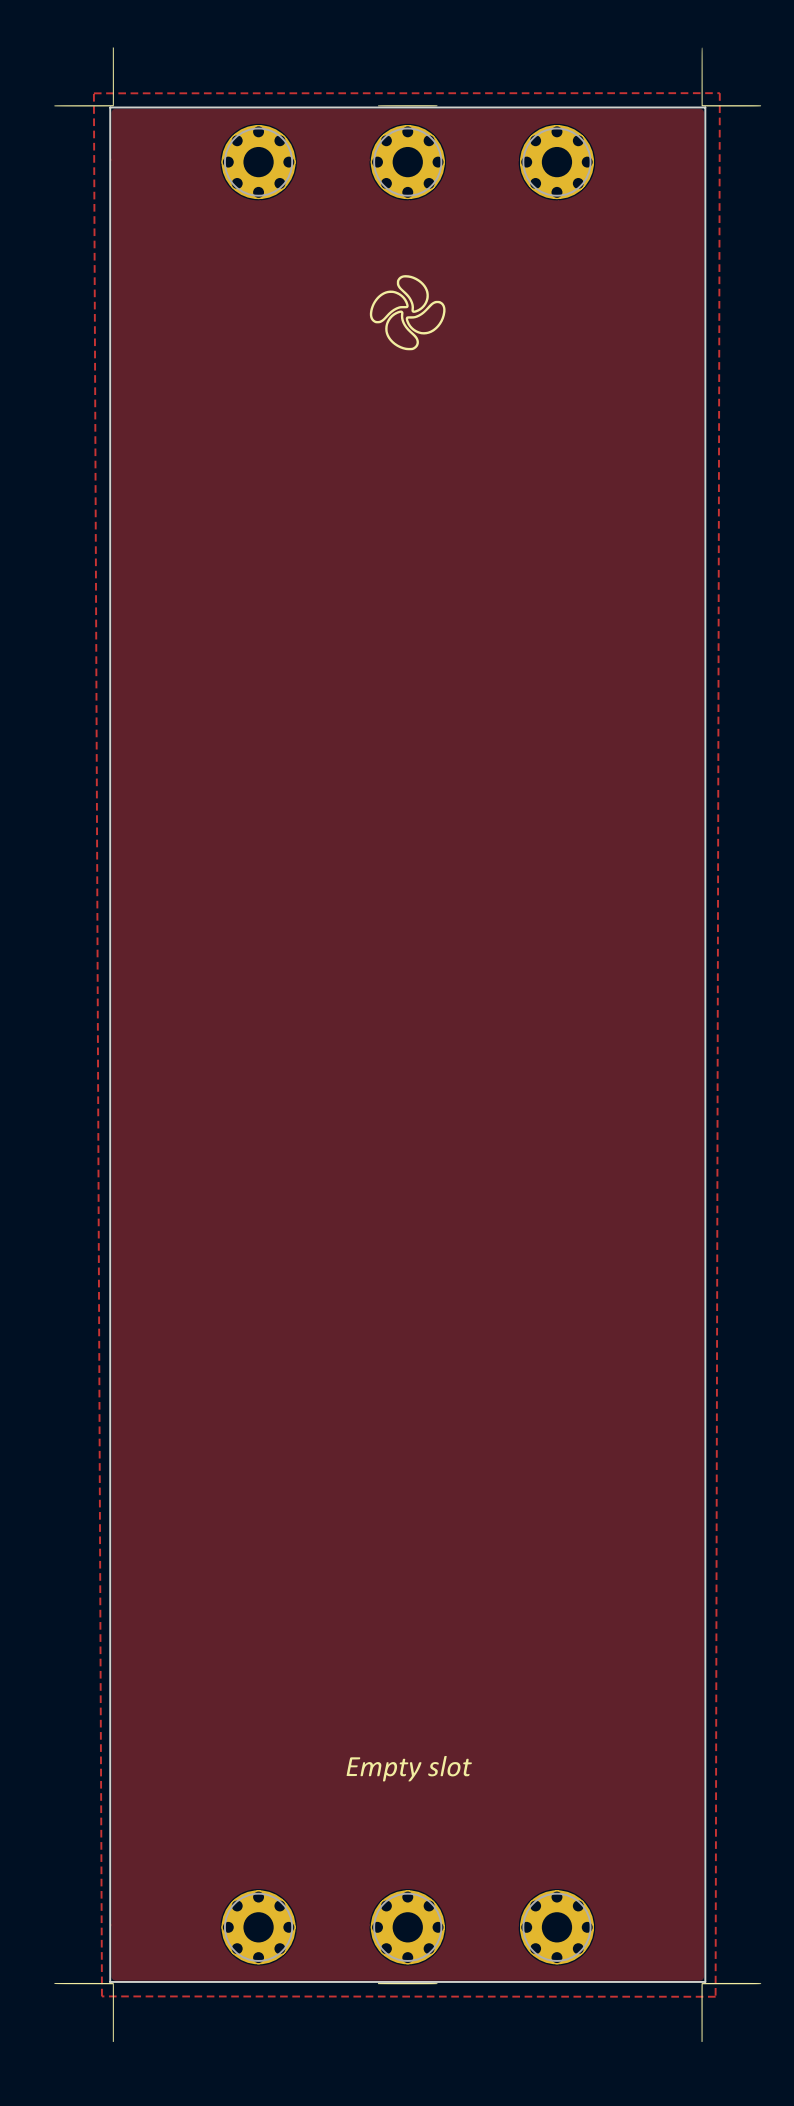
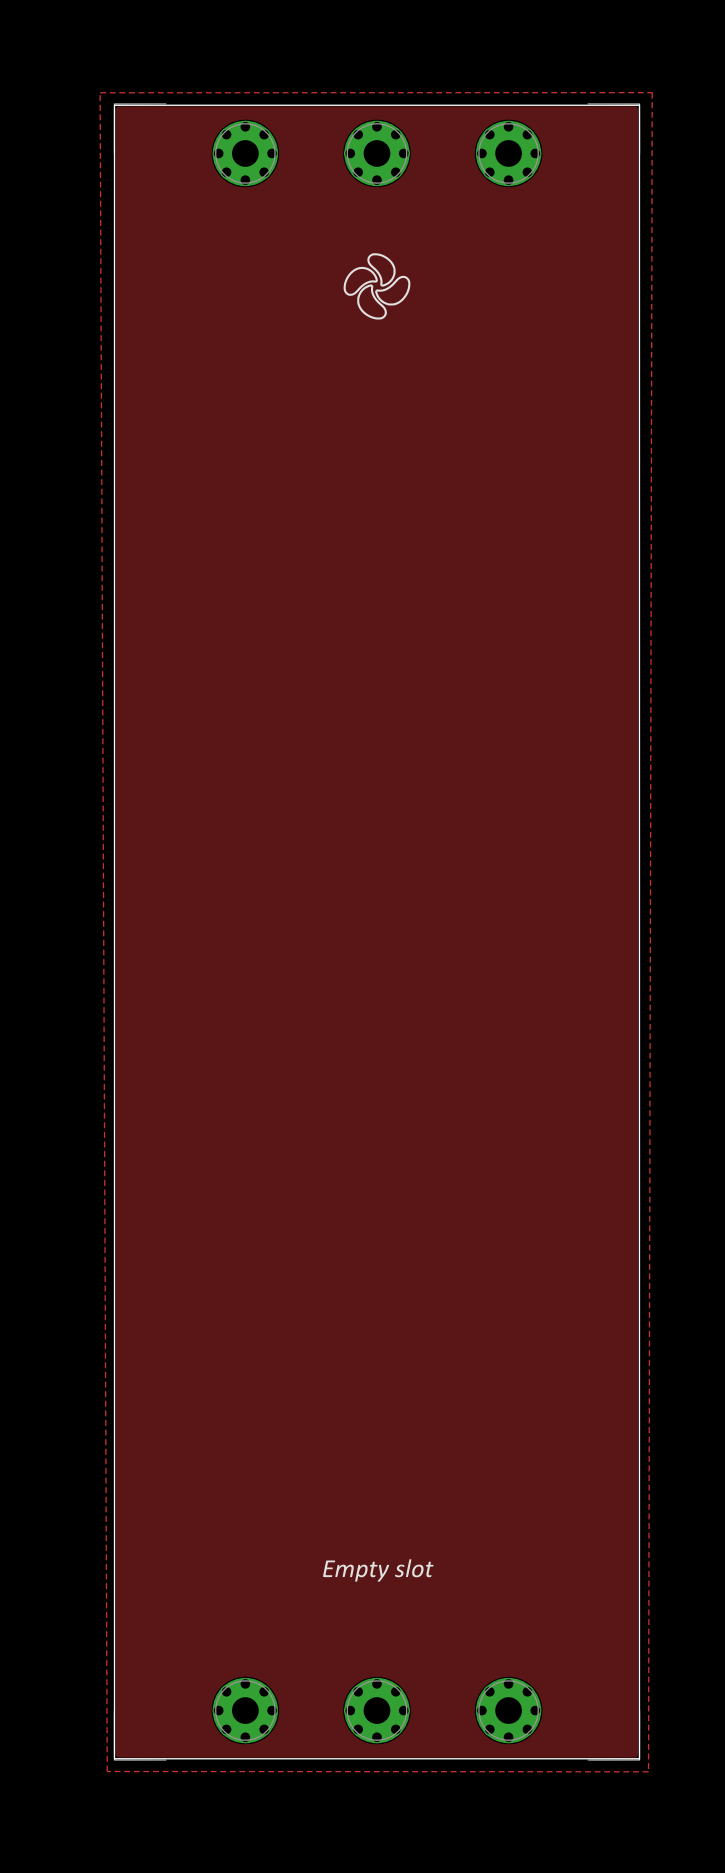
drawing shape: [54, 47, 762, 2042] -> [113, 103, 641, 1761]

